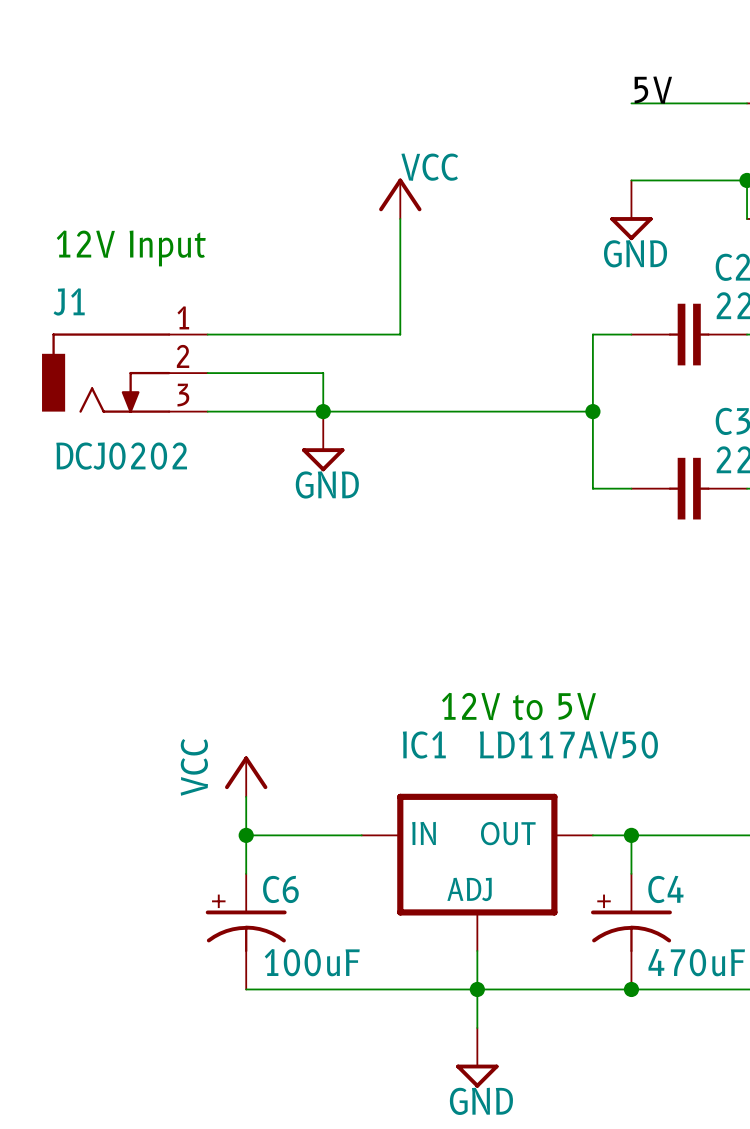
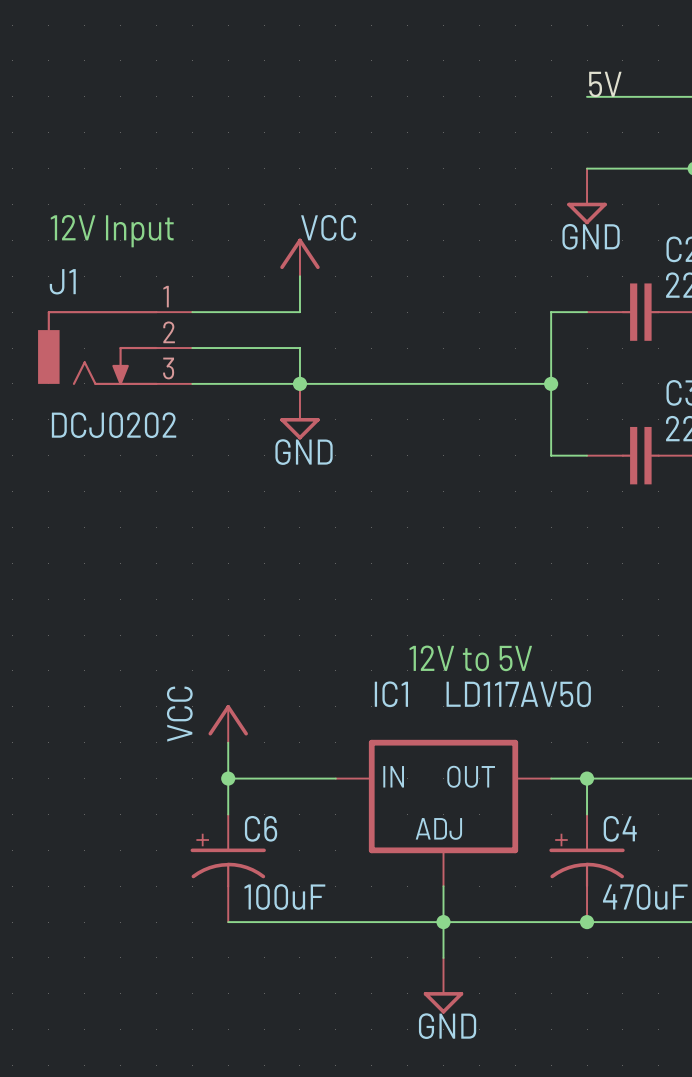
power symbol position: VCC (400, 198) -> VCC (299, 257)
wire: (400, 218) (400, 334) (323, 334) -> (299, 276) (299, 312)

